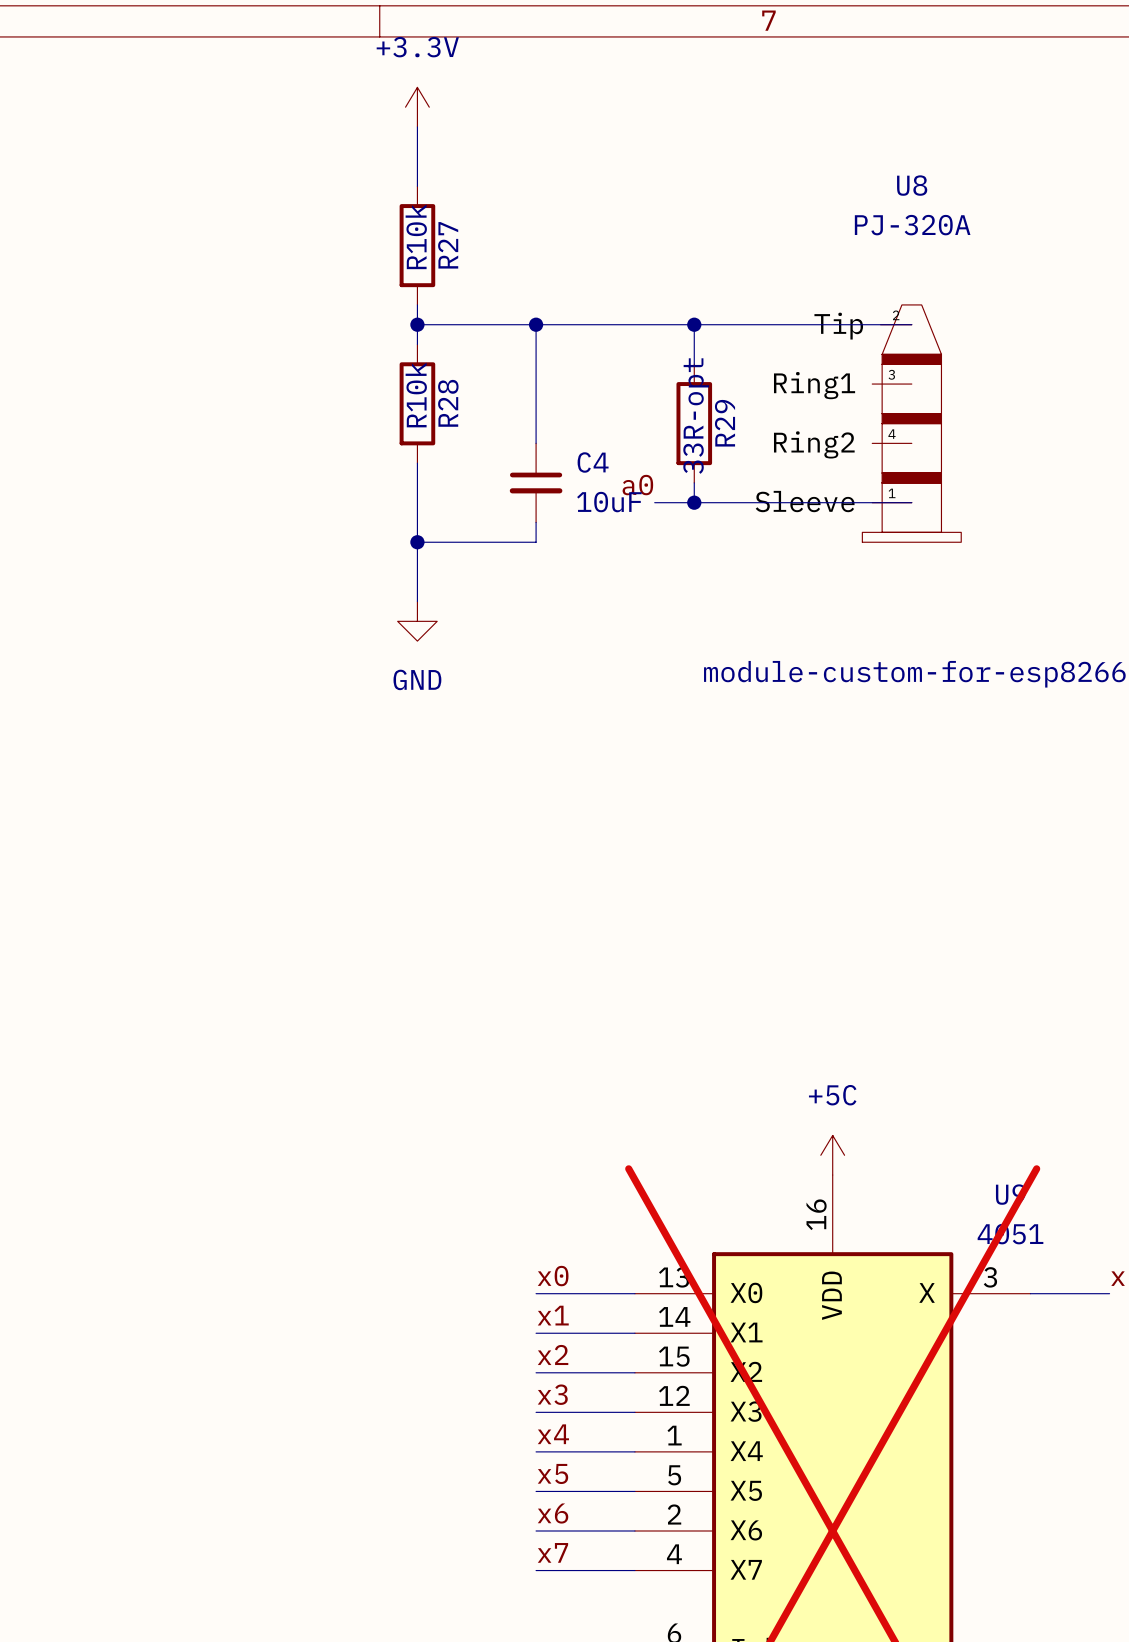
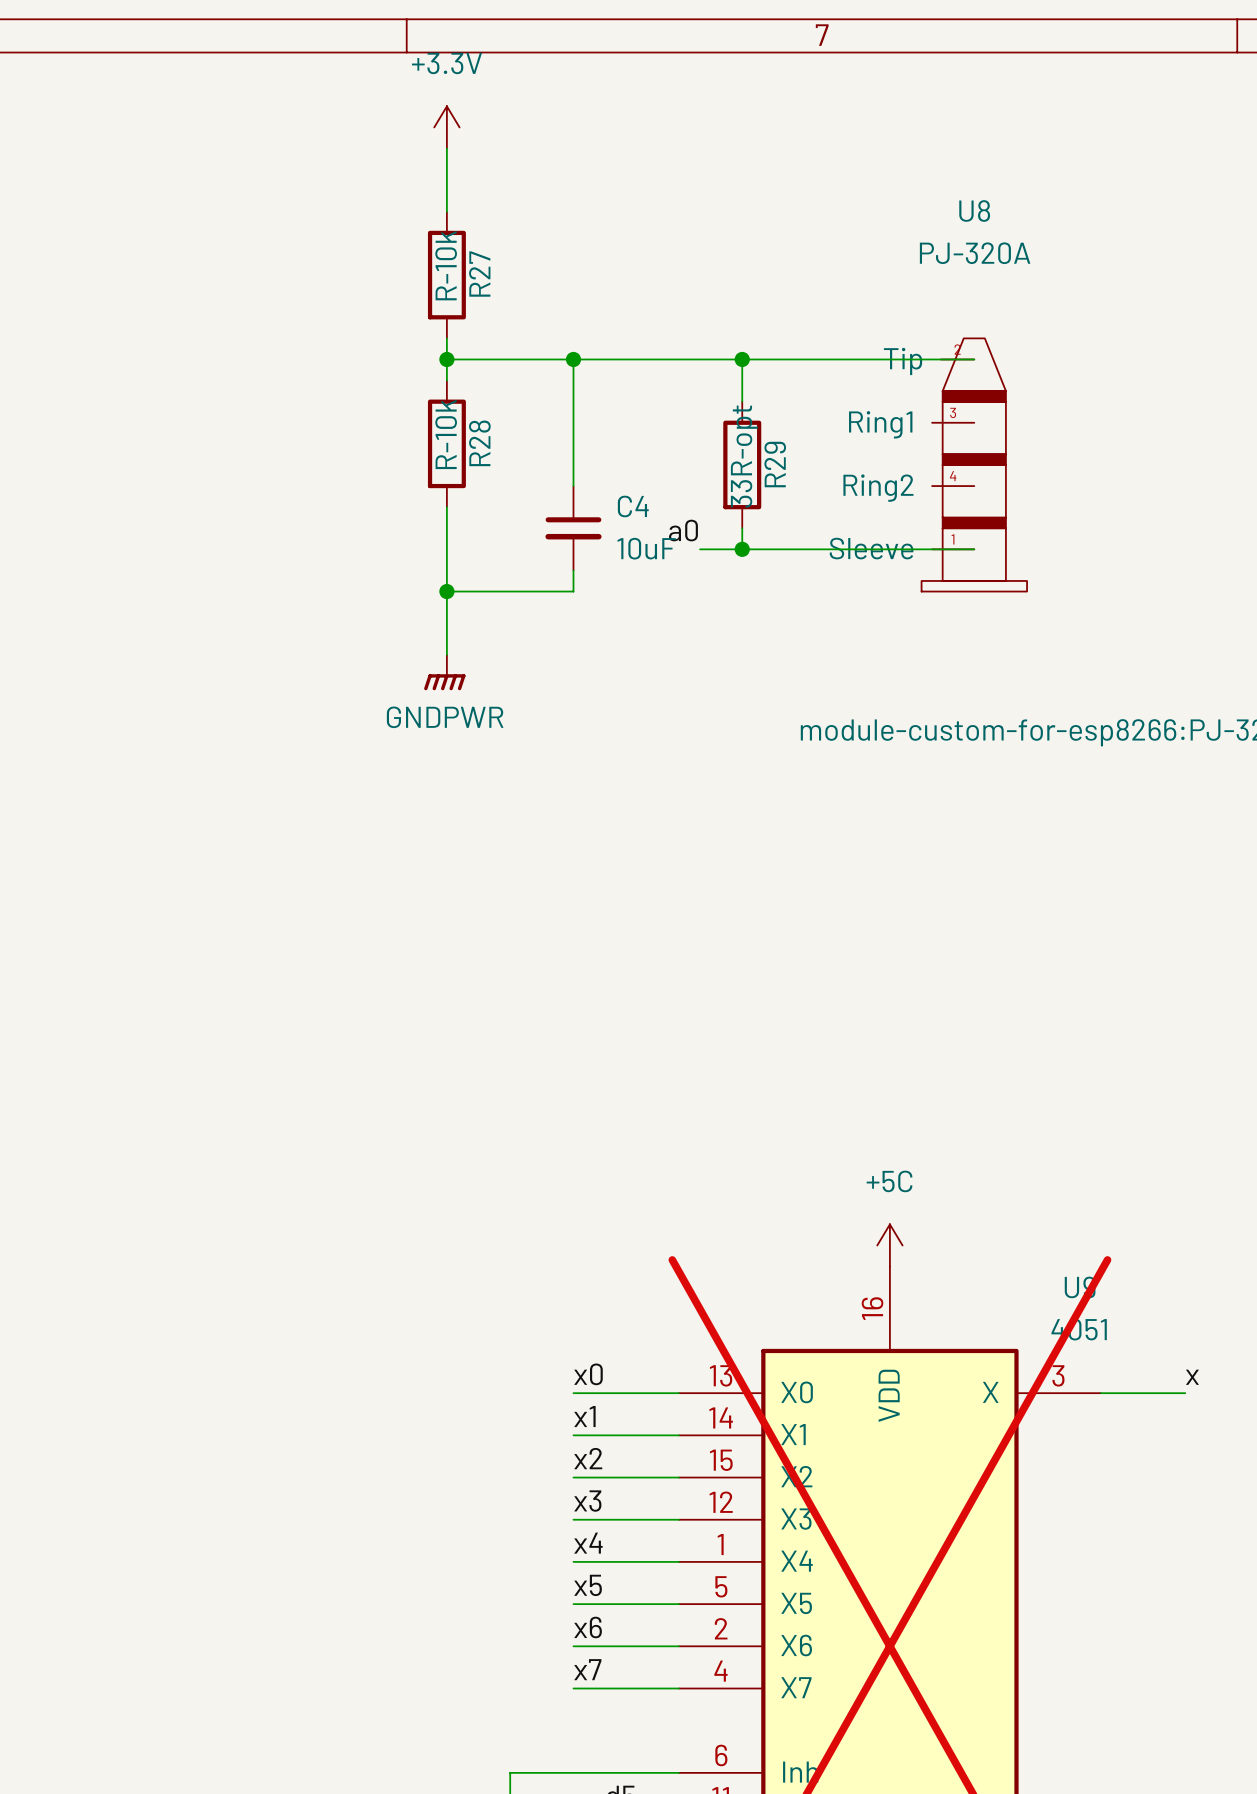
R27 value: R10k (416, 236) -> R-10k (446, 265)
R28 value: R10k (416, 395) -> R-10k (446, 434)
power symbol: GND (417, 621) -> GNDPWR (444, 672)

